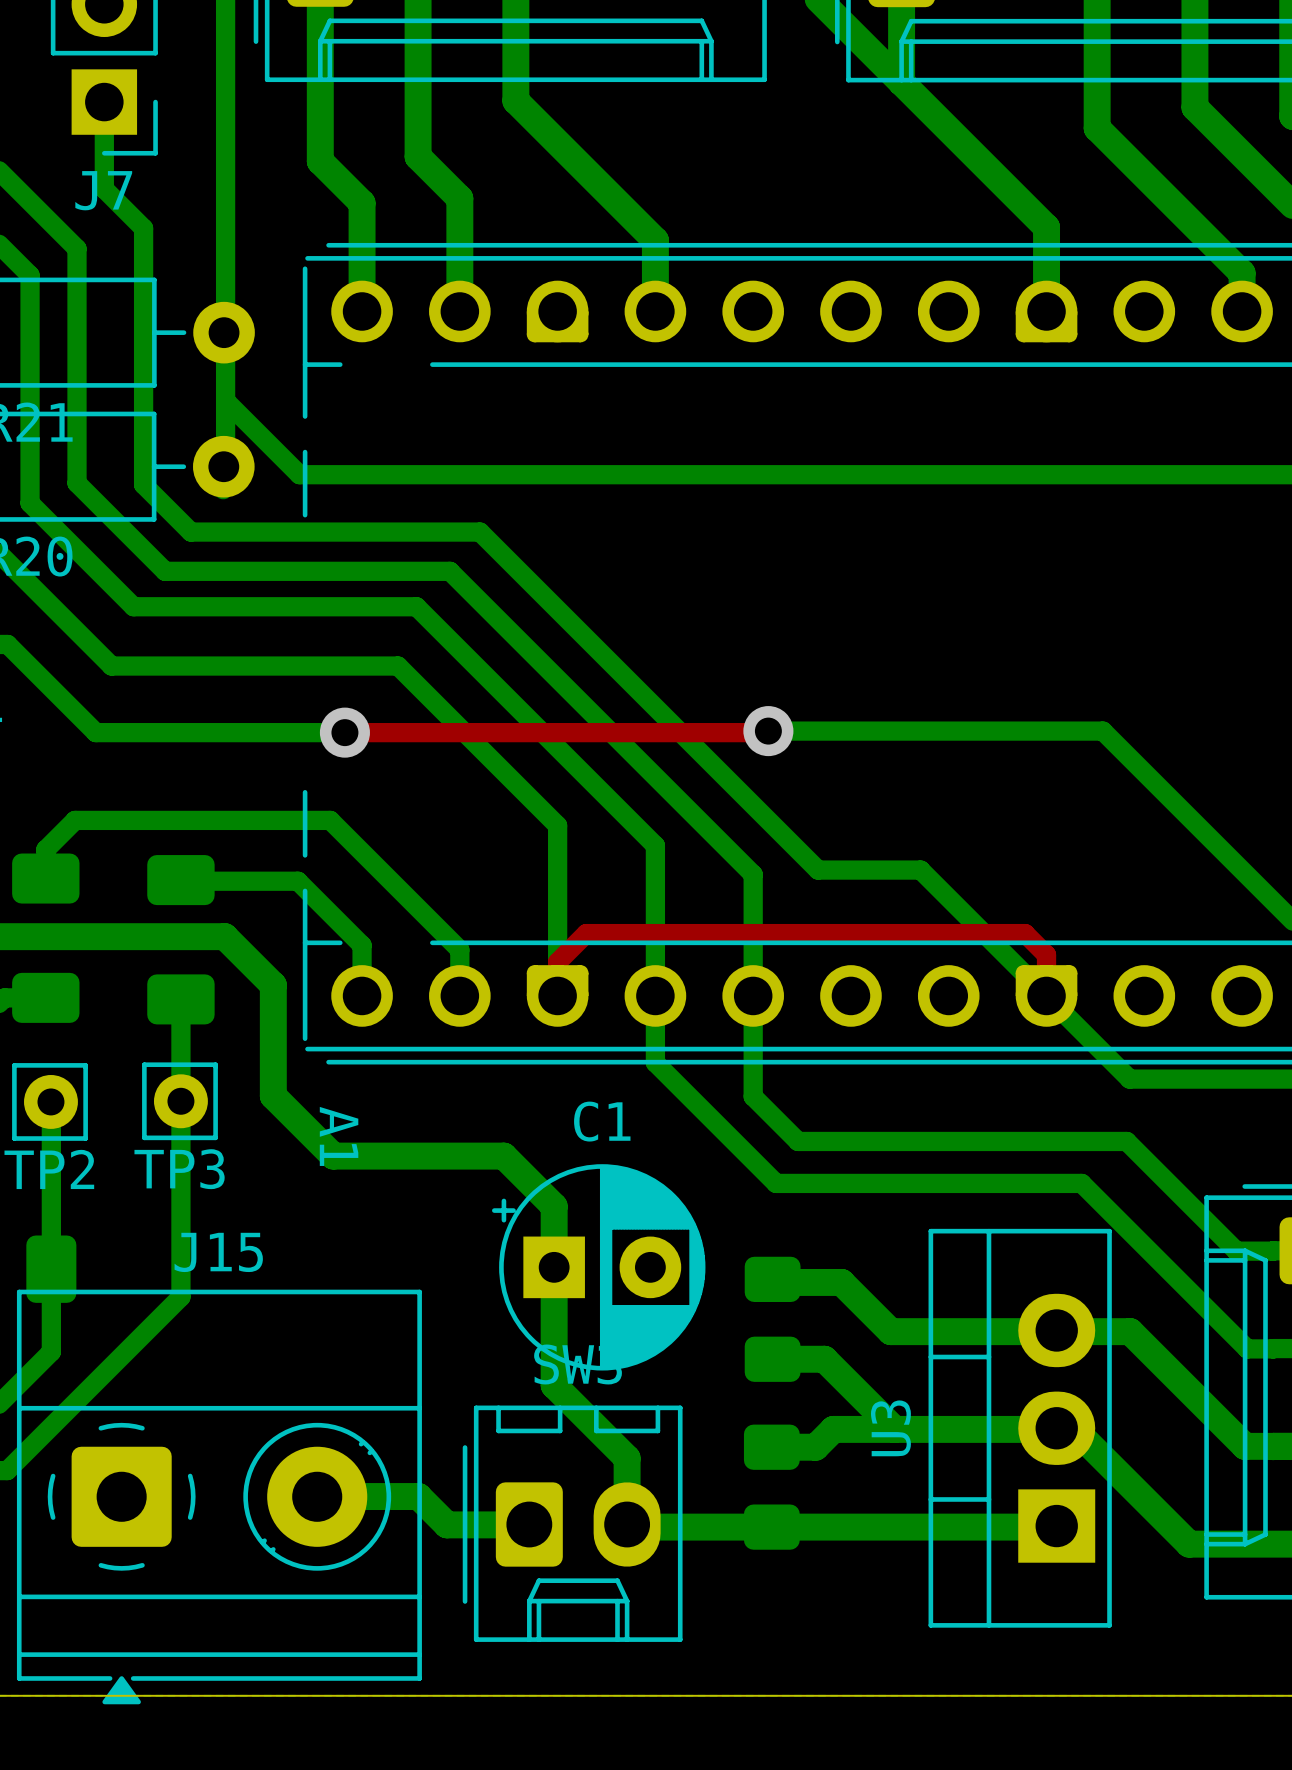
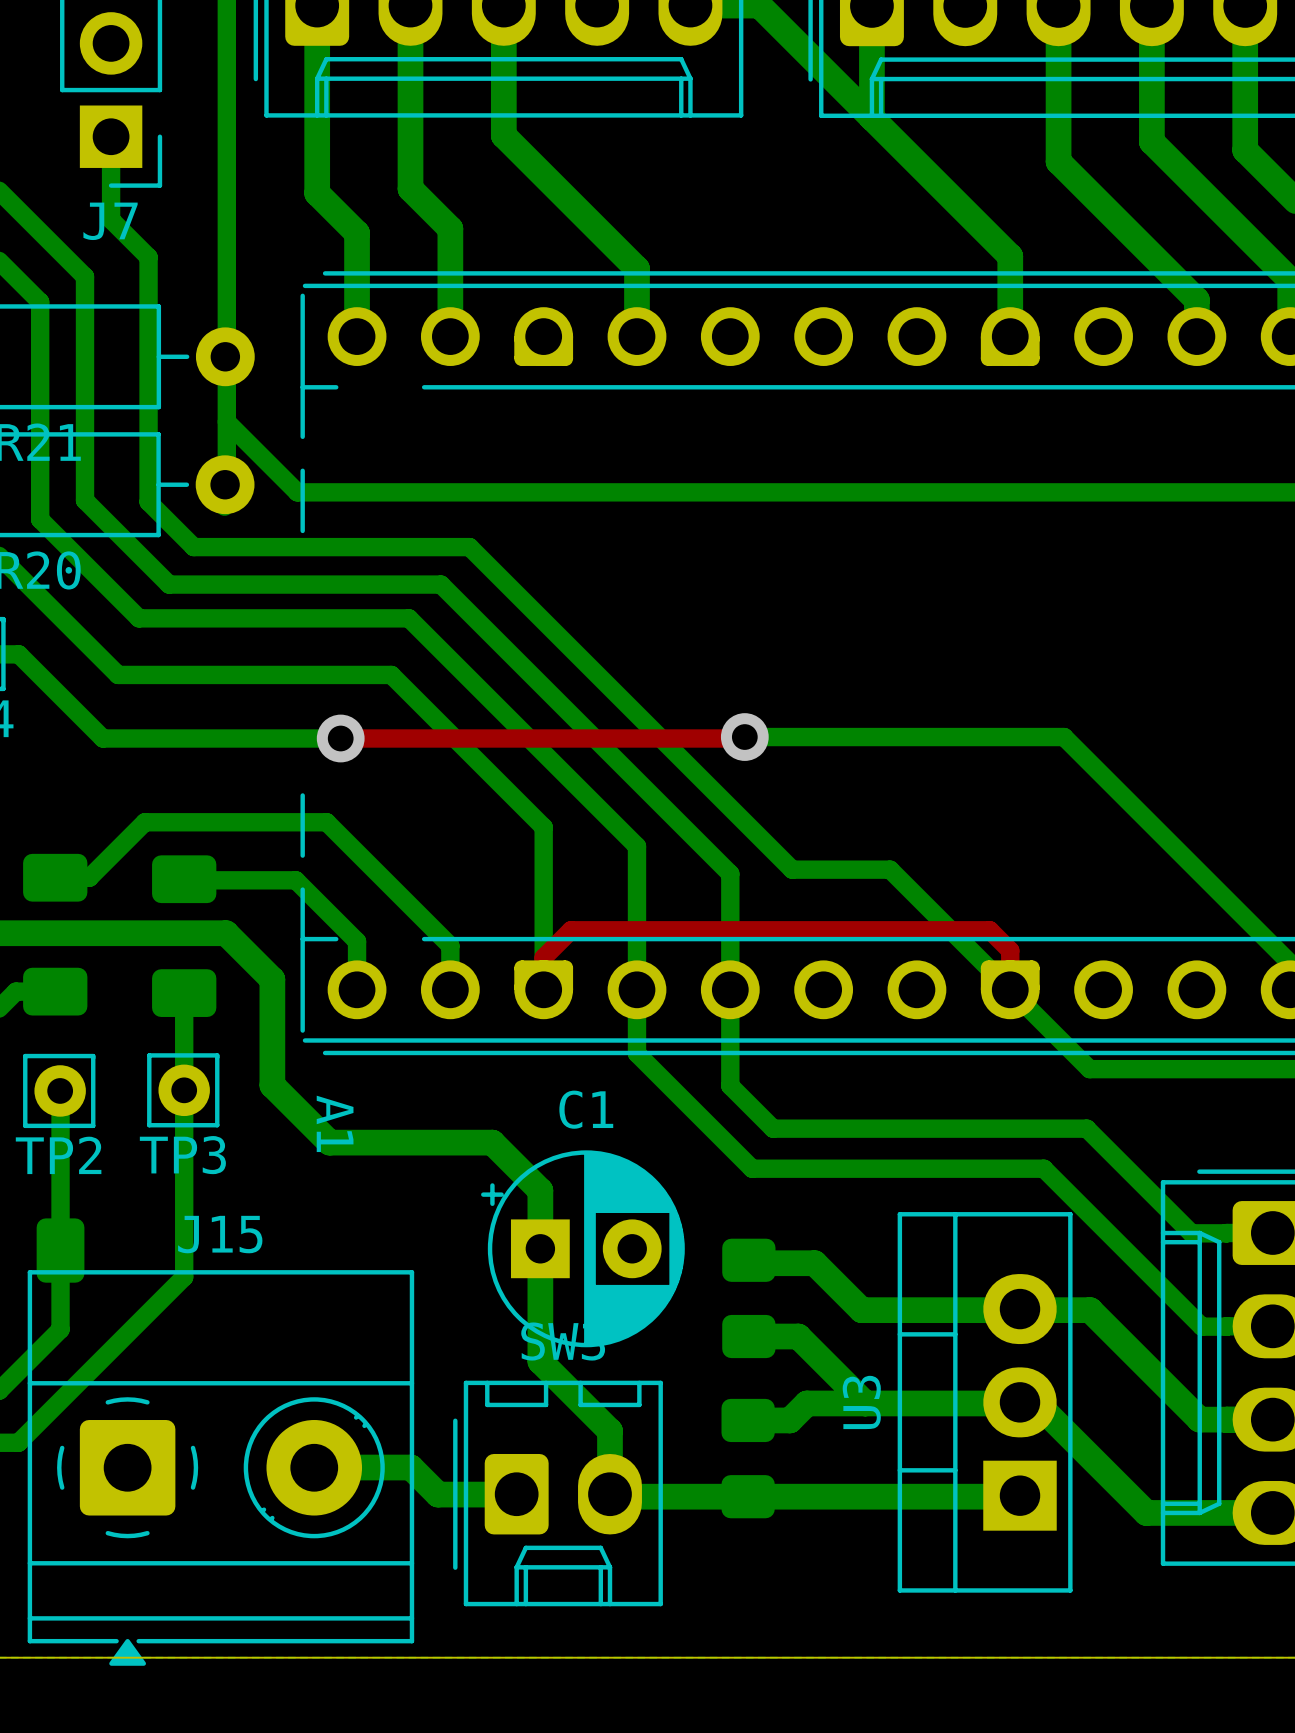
bottom track: (139, 820) (75, 820) (45, 849) (45, 878) -> (144, 822) (89, 877) (55, 877)

